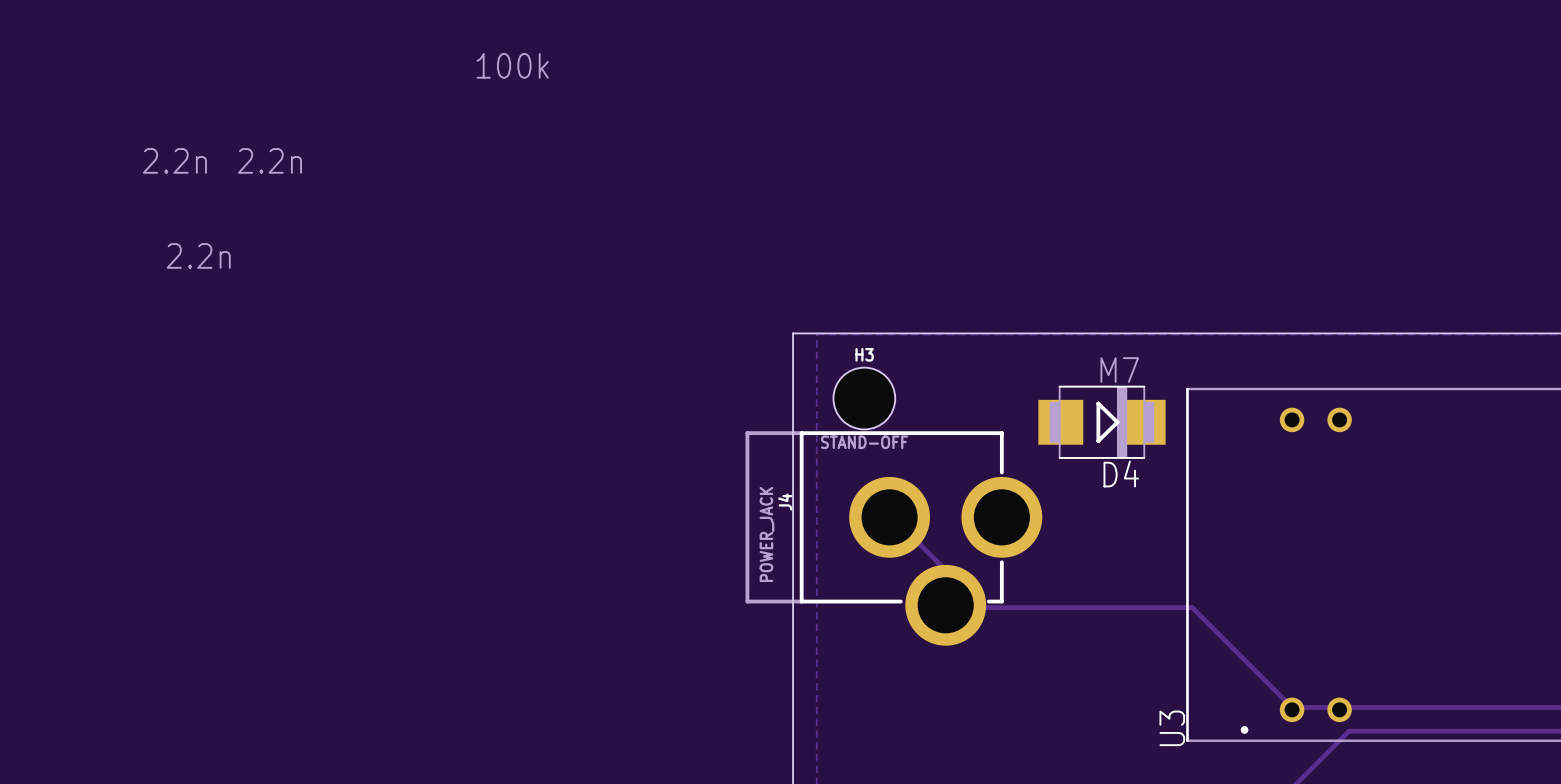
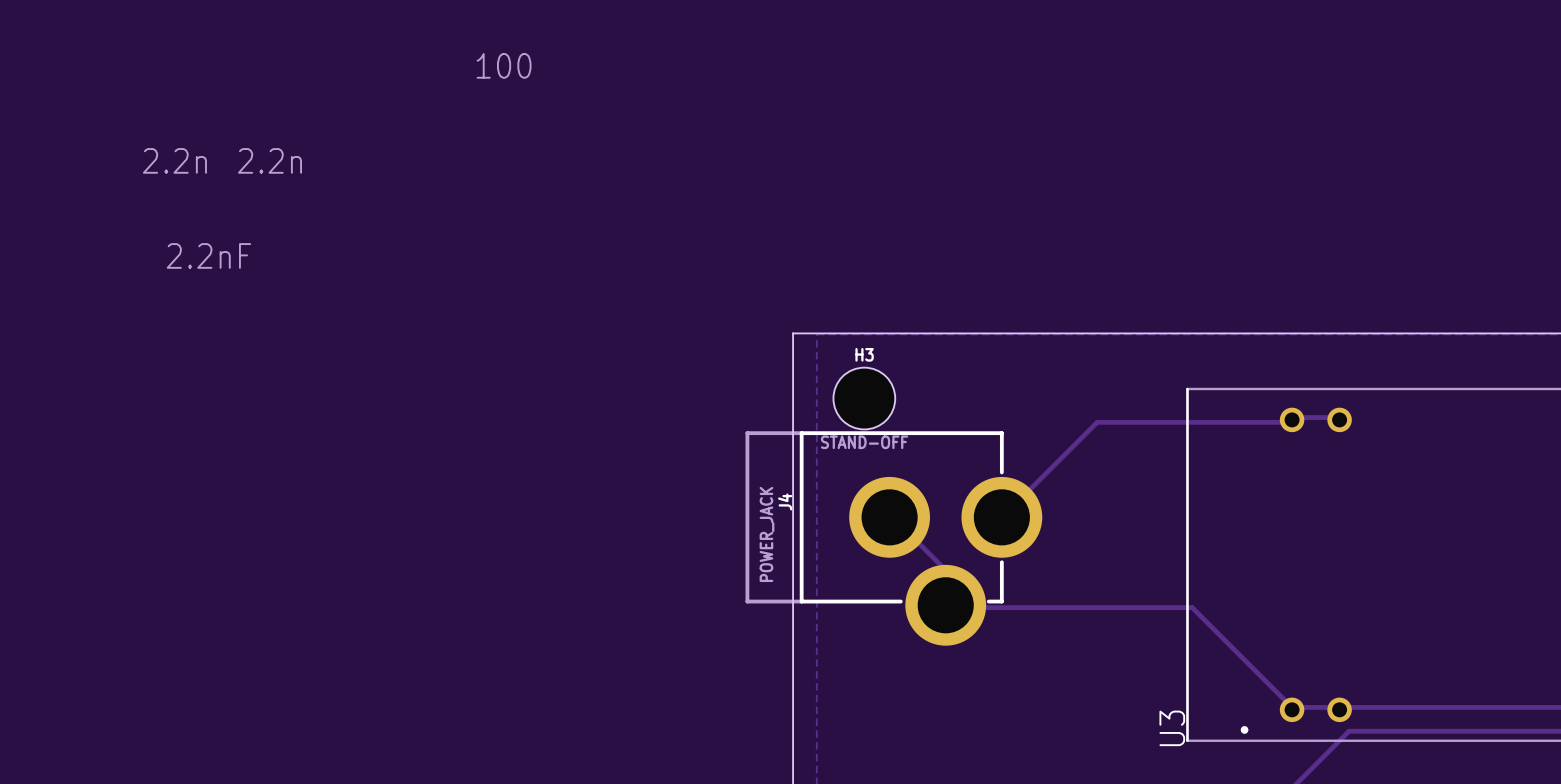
part value: 100k (512, 65) -> 100 (504, 65)
part value: 2.2n (198, 255) -> 2.2nF (208, 255)
track: none -> (1339, 419) (1339, 417) (1292, 417) (1292, 422) (1097, 422) (1002, 517)
D4: M7 (1101, 422) -> none

